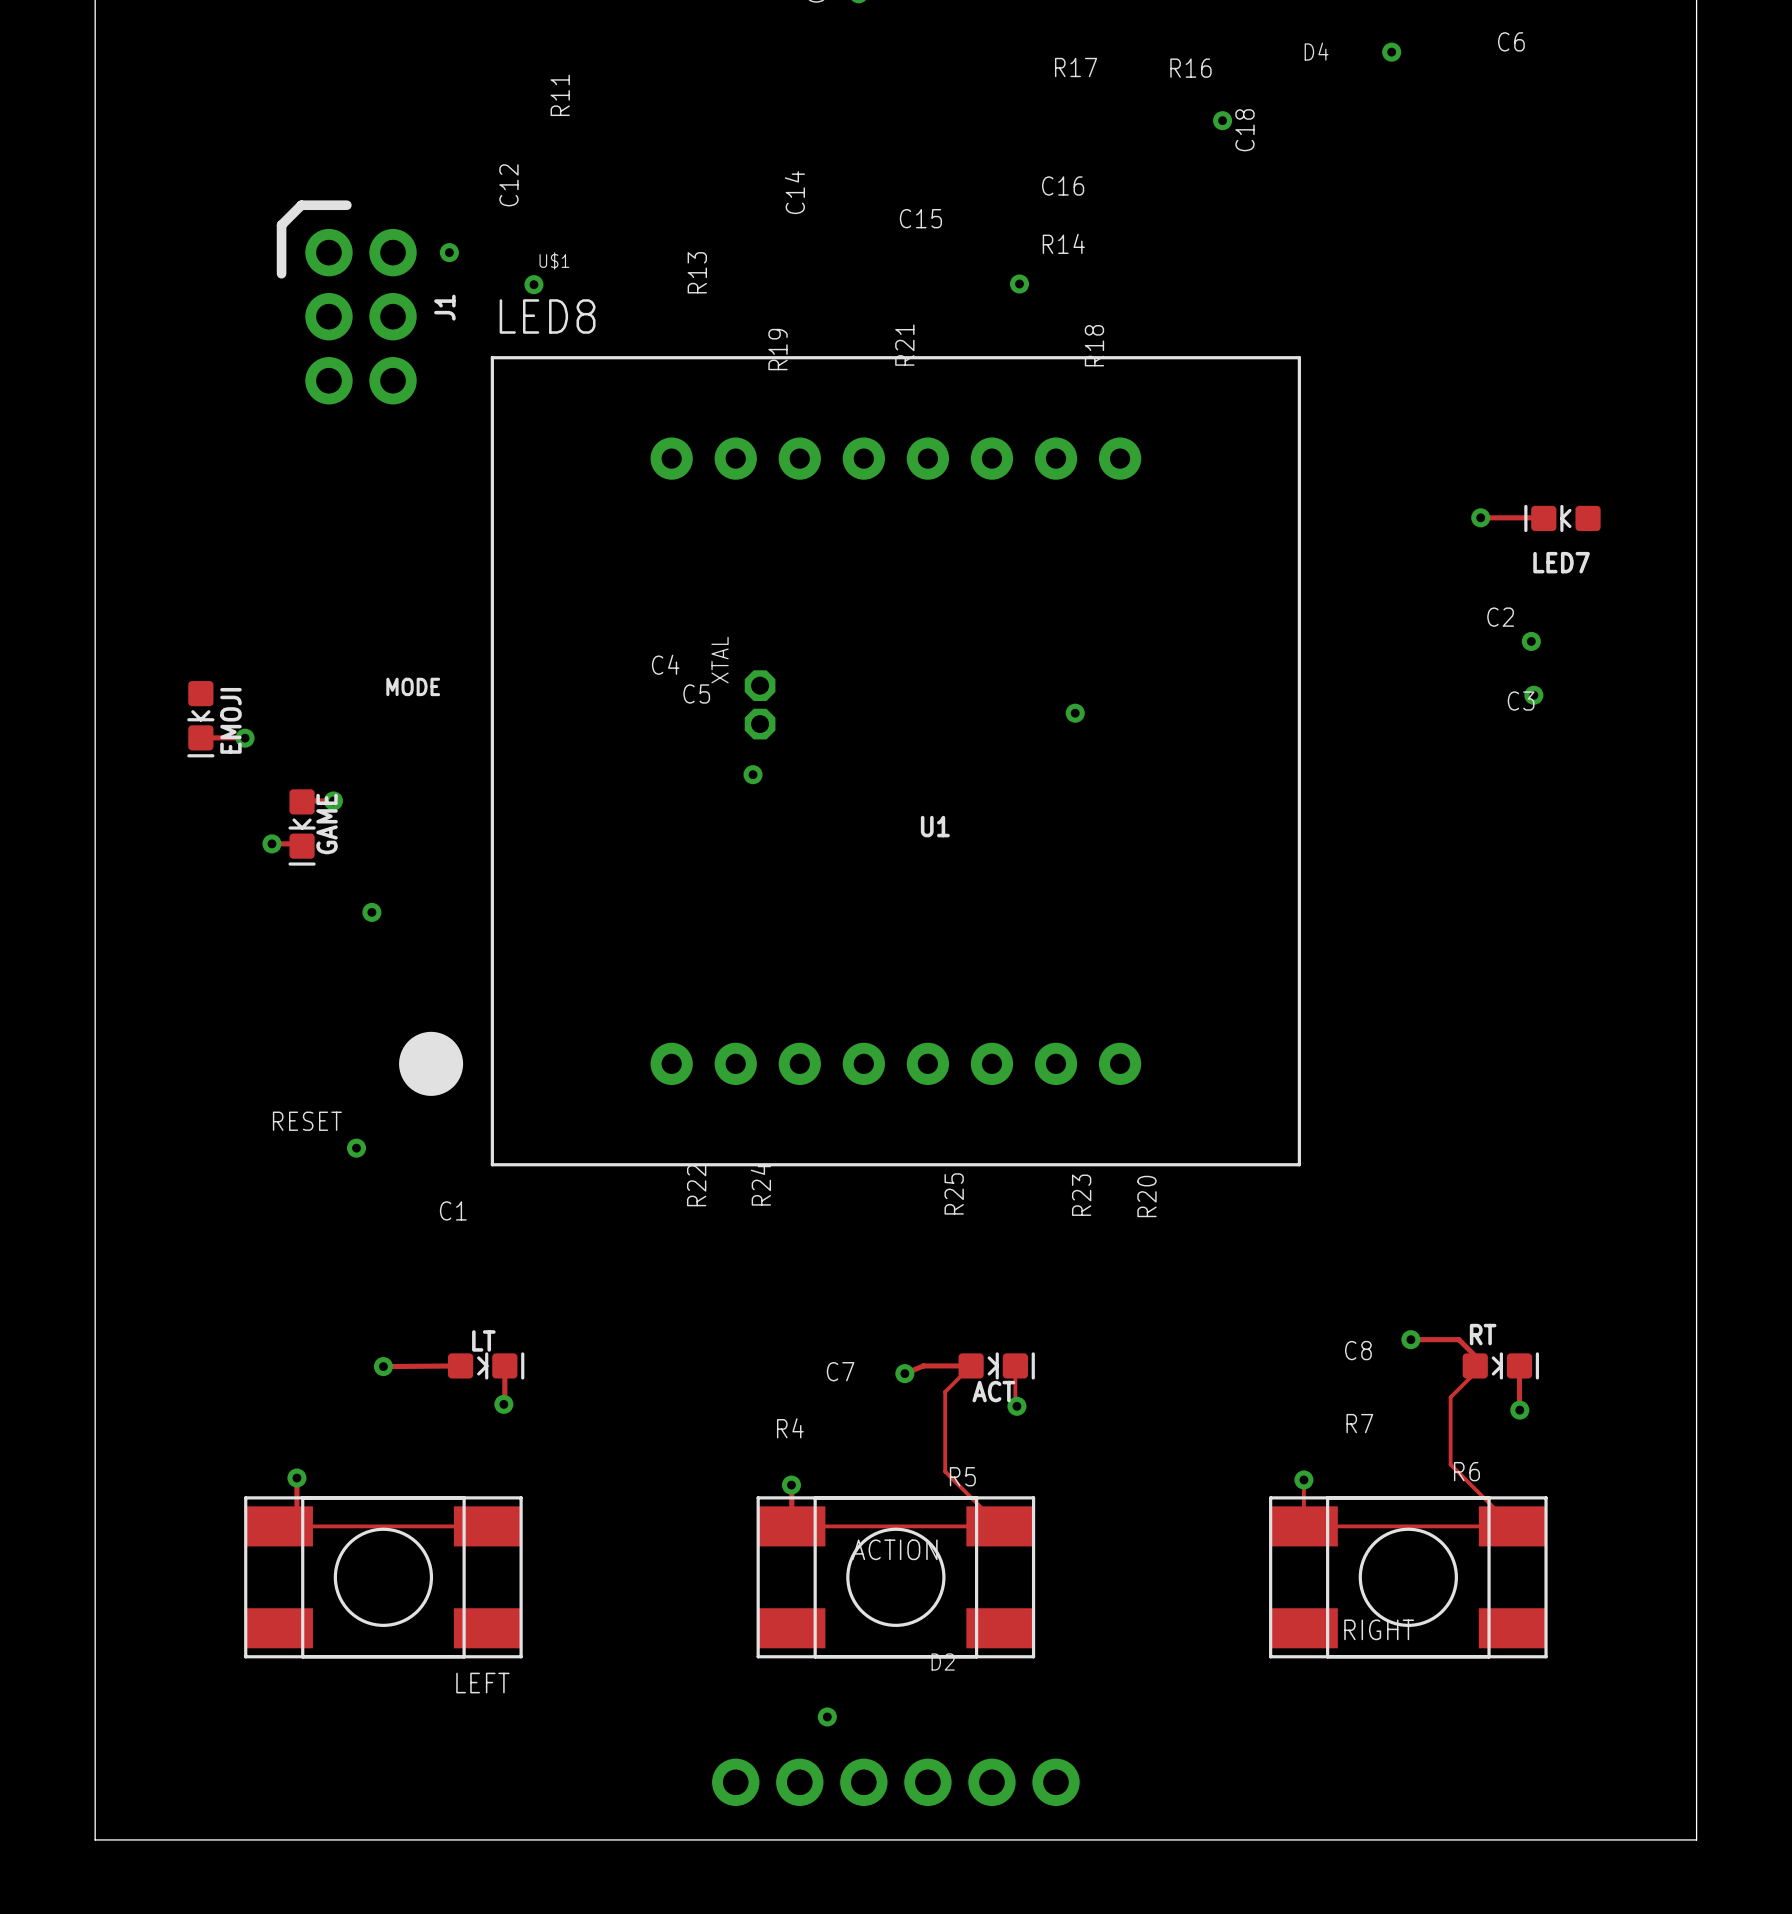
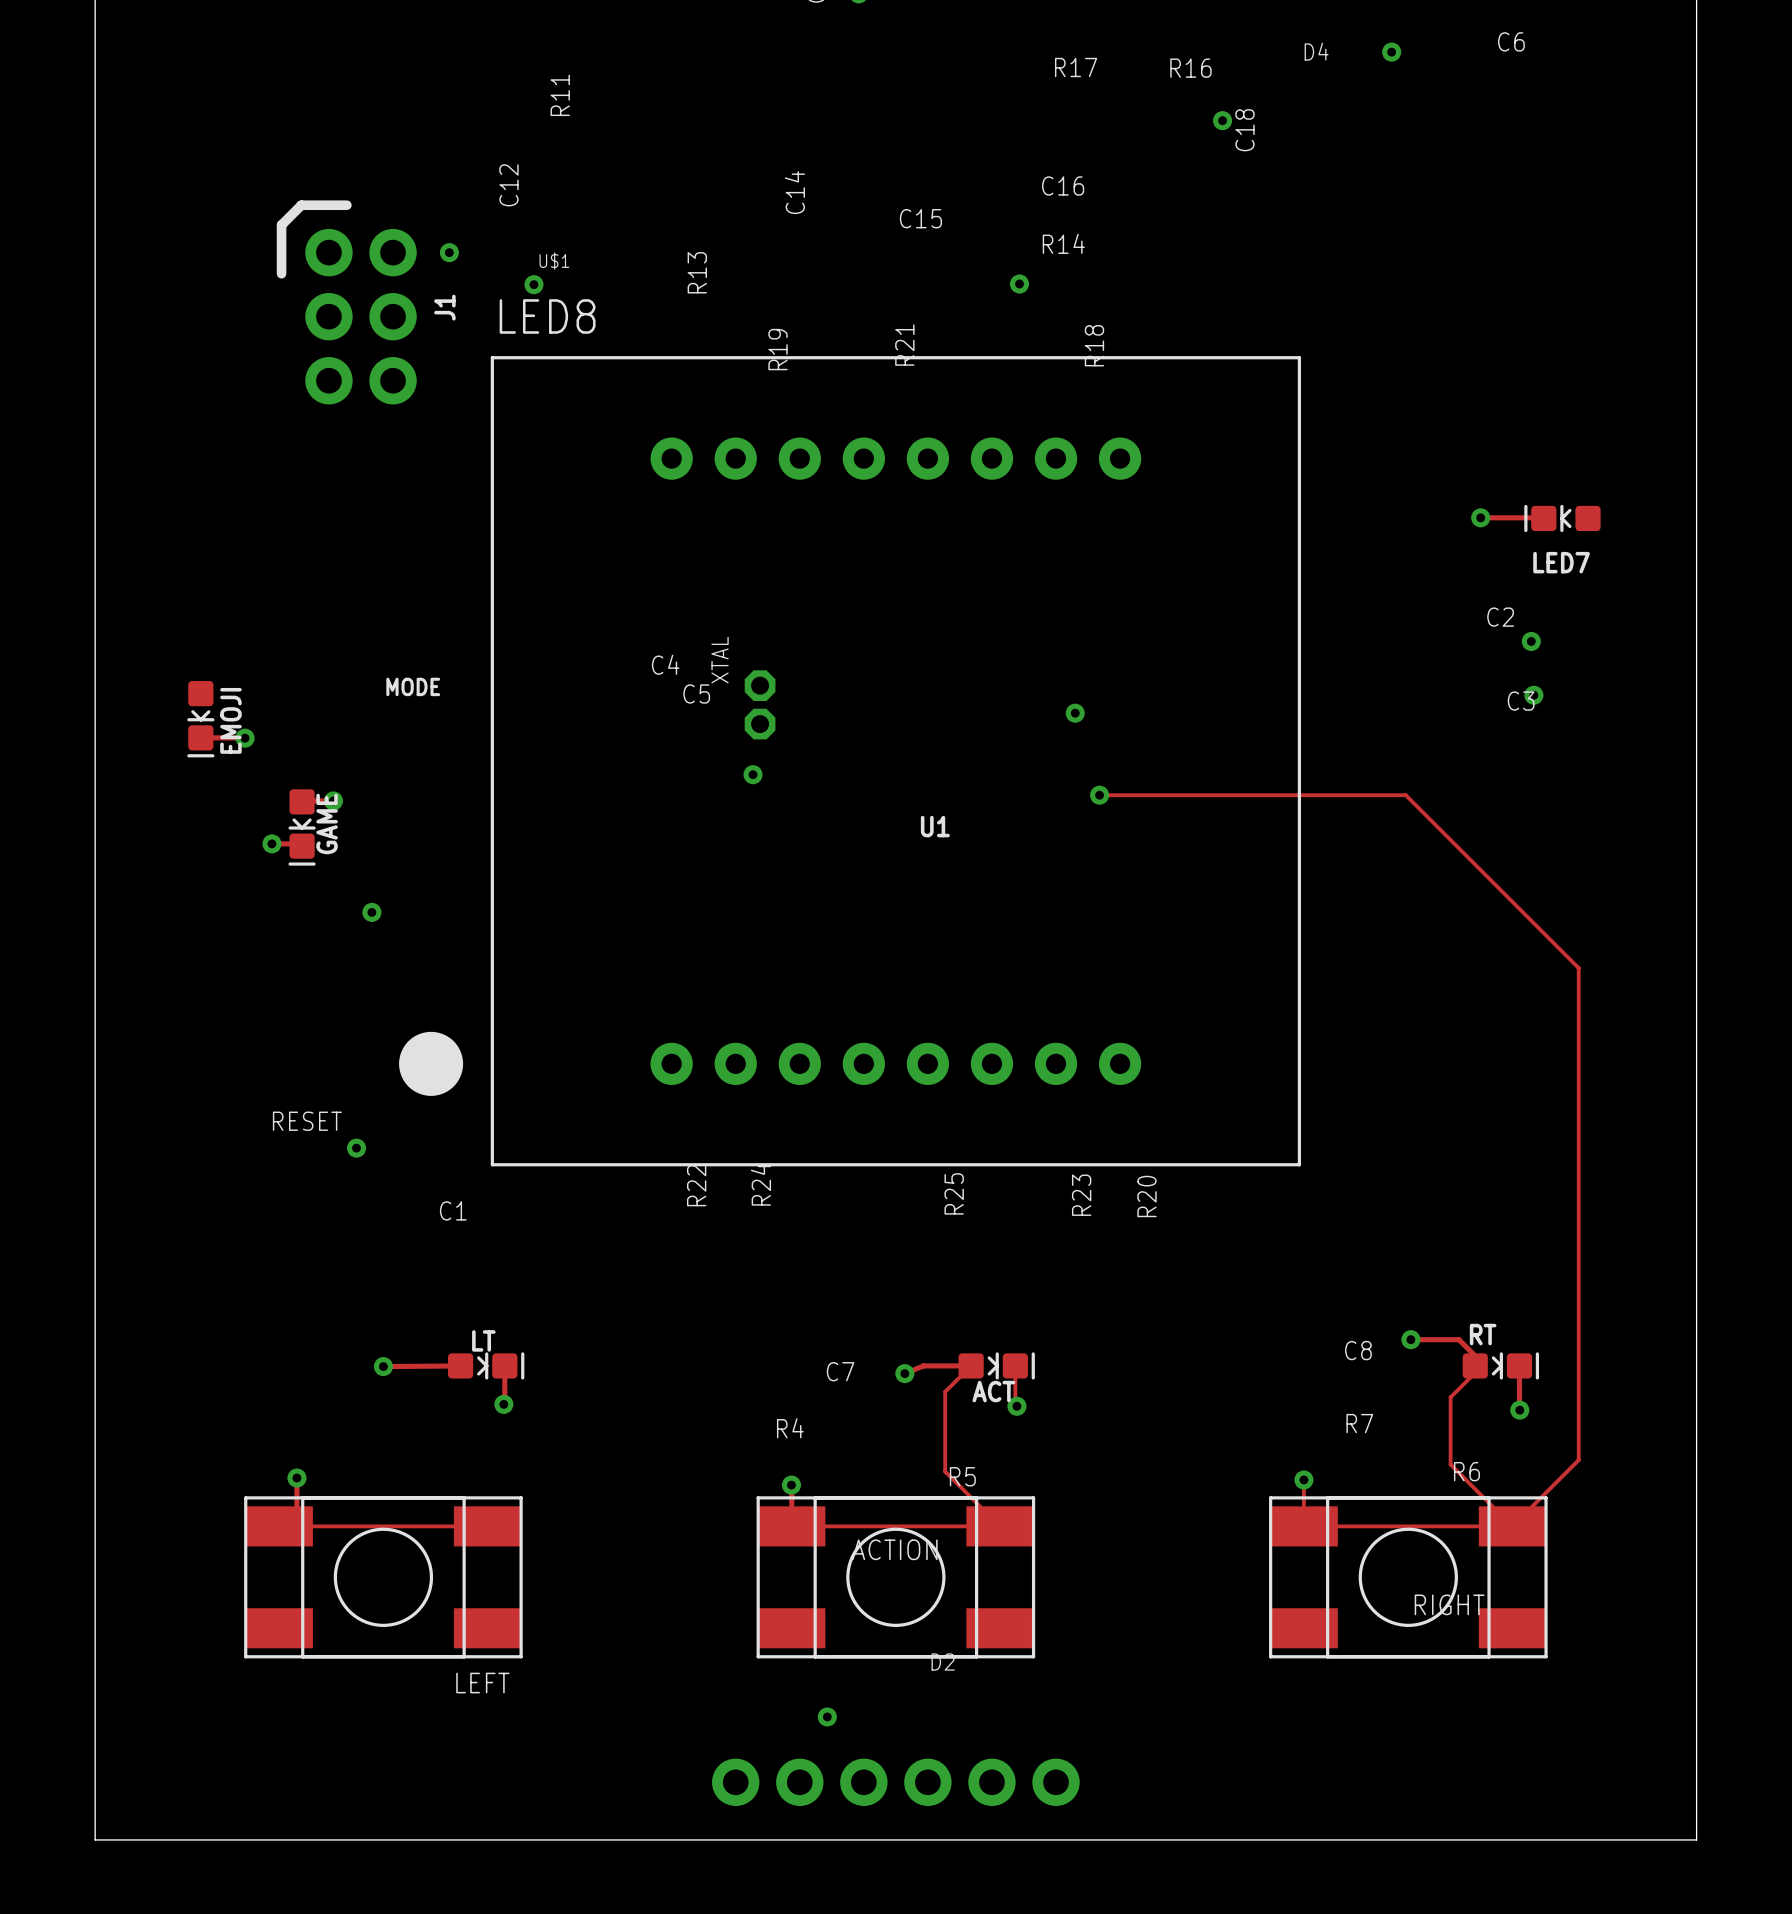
track: none -> (1099, 795) (1405, 795) (1578, 968) (1578, 1460) (1512, 1526)
via: none -> (1099, 795)
RIGHT name position: RIGHT (1379, 1629) -> RIGHT (1449, 1604)

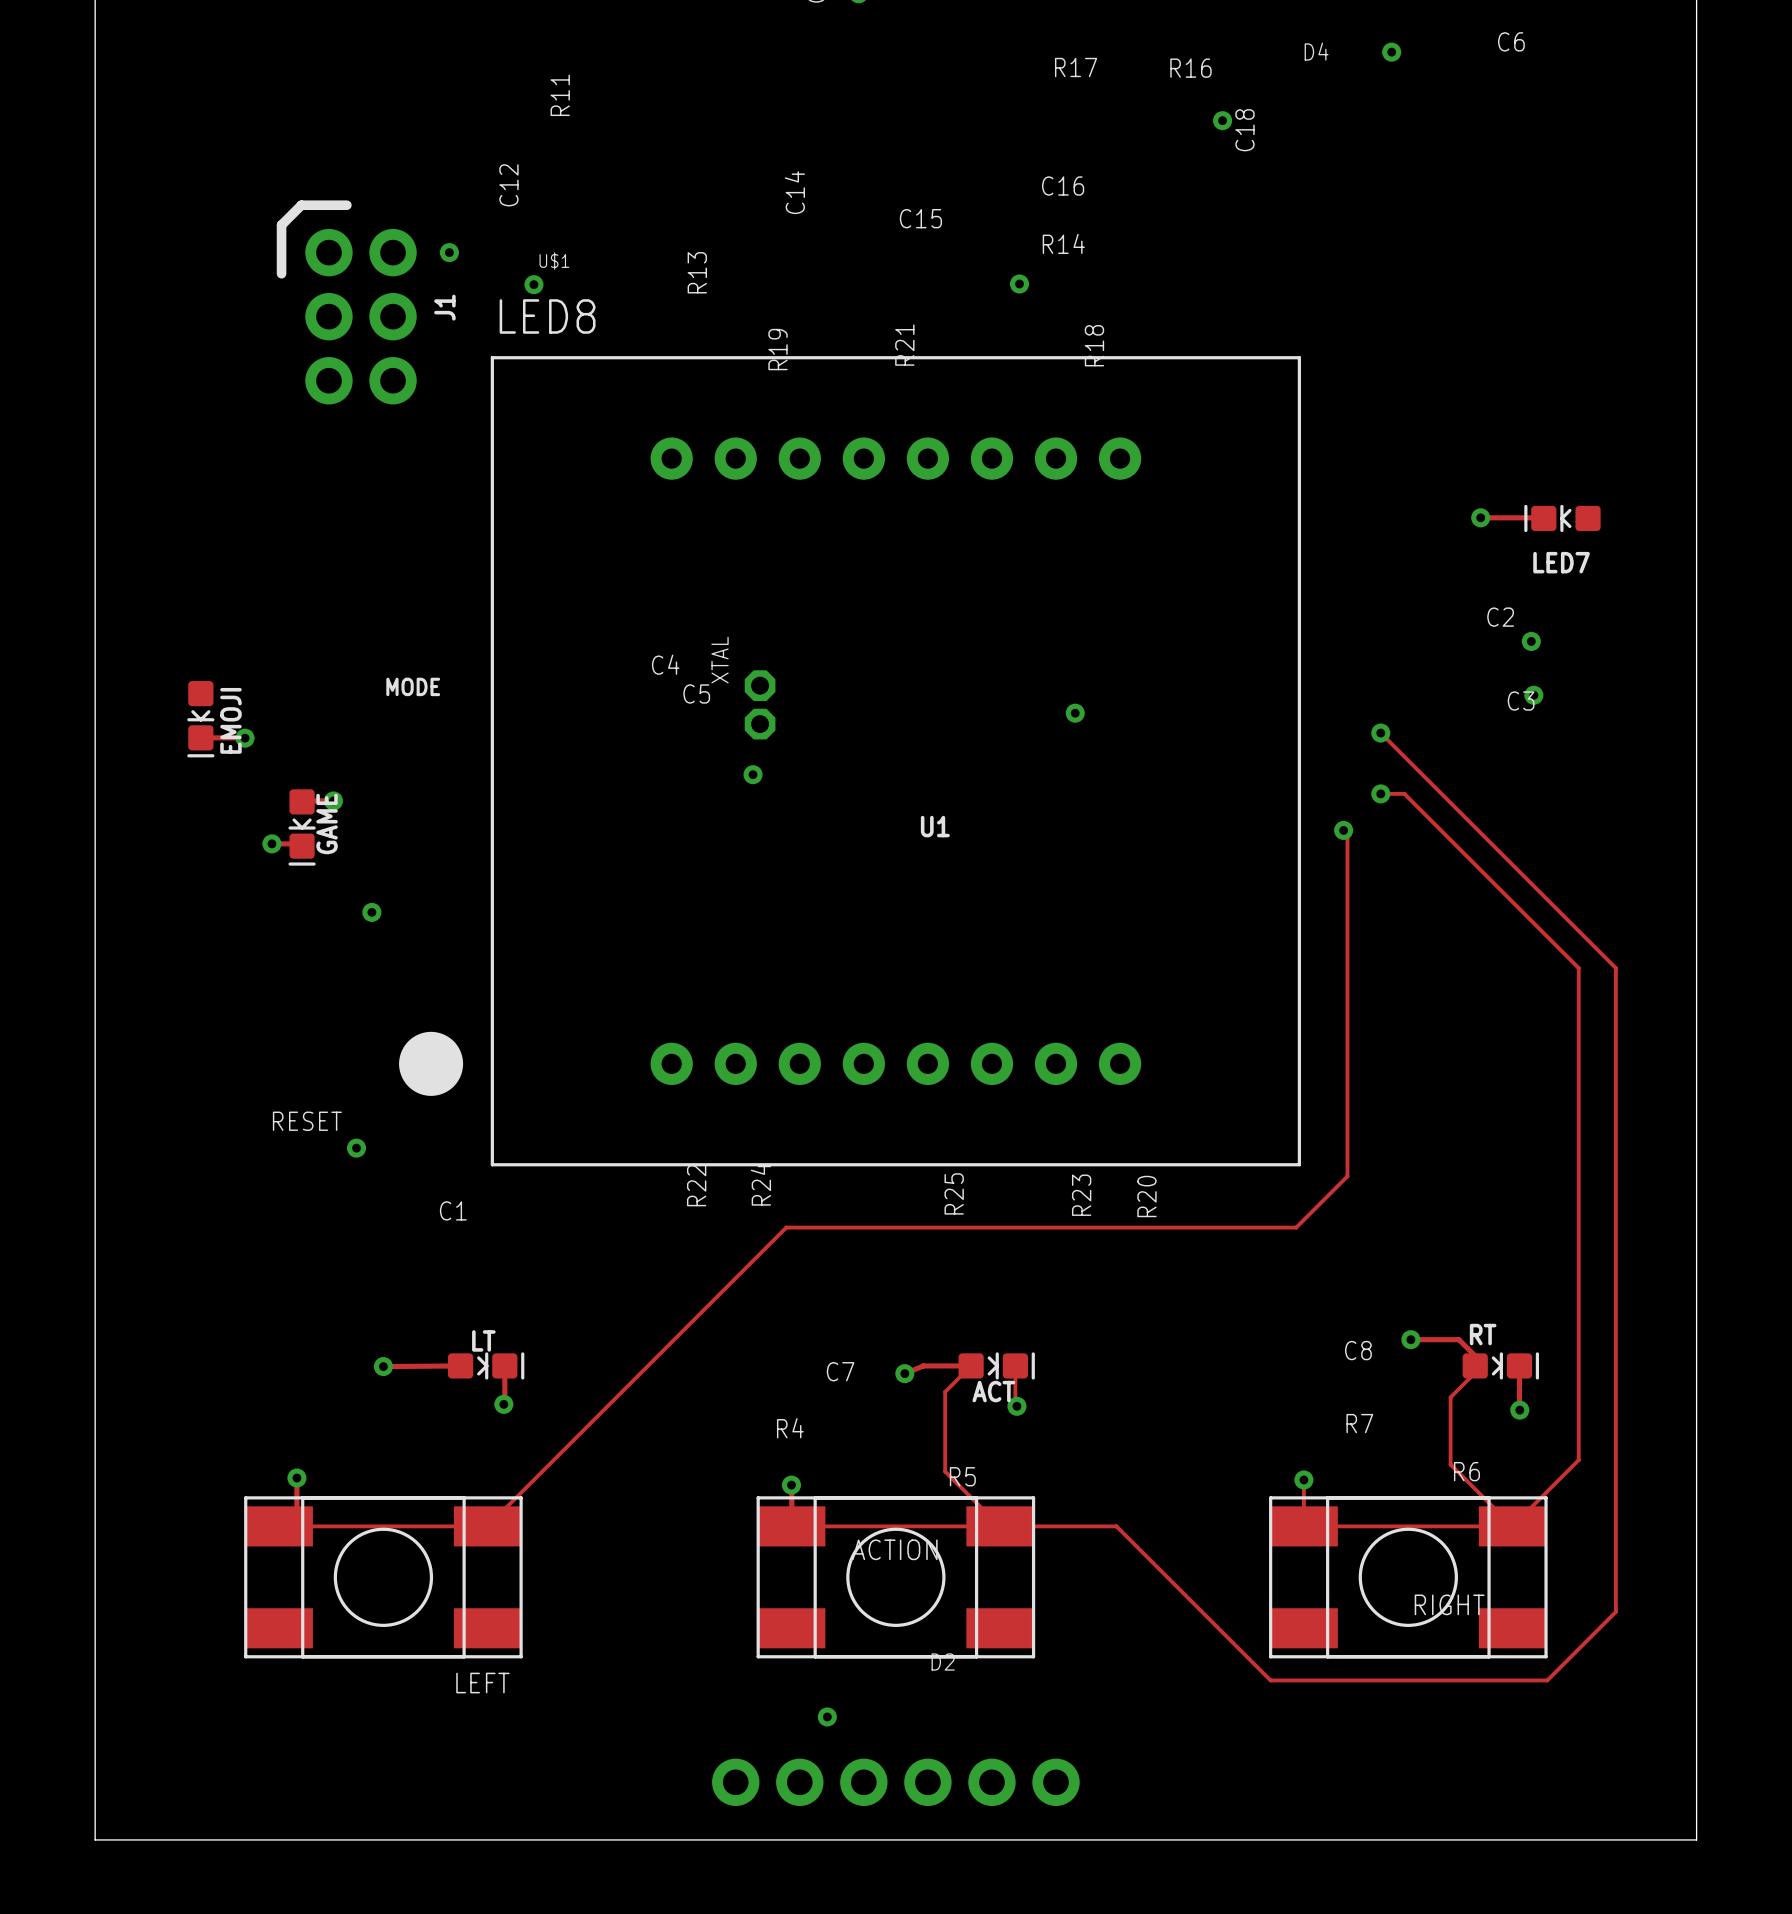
track: none -> (1380, 733) (1615, 968) (1615, 1611) (1547, 1680) (1270, 1680) (1116, 1526) (999, 1526)
via: none -> (1380, 733)
via: none -> (1380, 793)
track: (1099, 795) (1405, 795) -> (1380, 793) (1405, 795)
via: (1099, 795) -> none
track: none -> (1343, 830) (1347, 830) (1347, 1176) (1296, 1227) (786, 1227) (487, 1526)
via: none -> (1343, 830)

